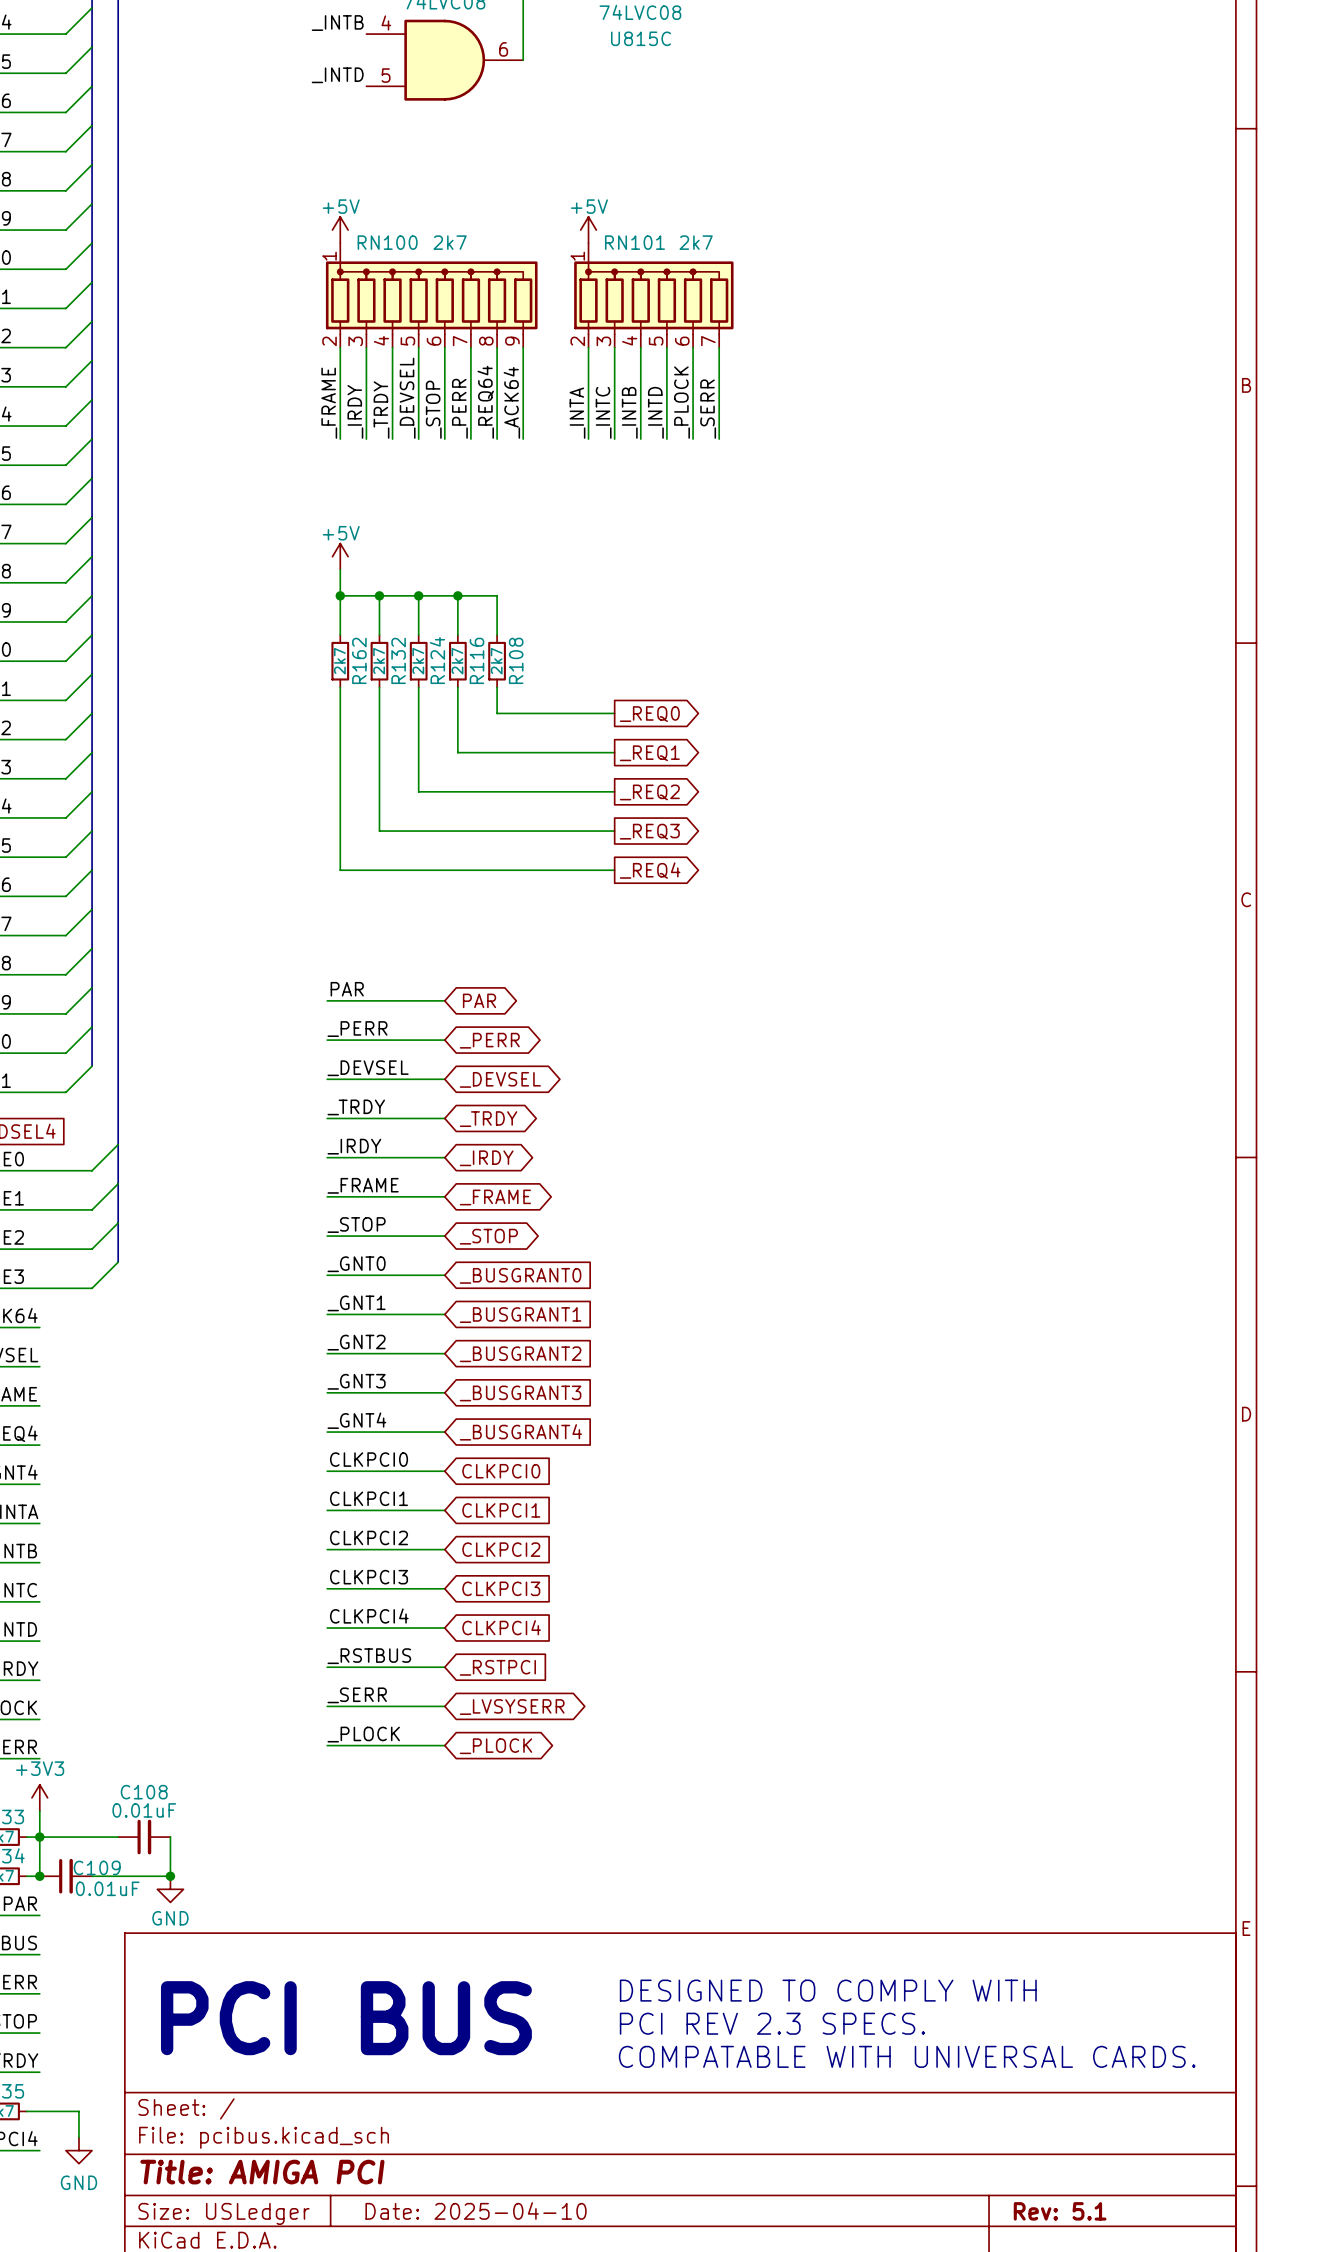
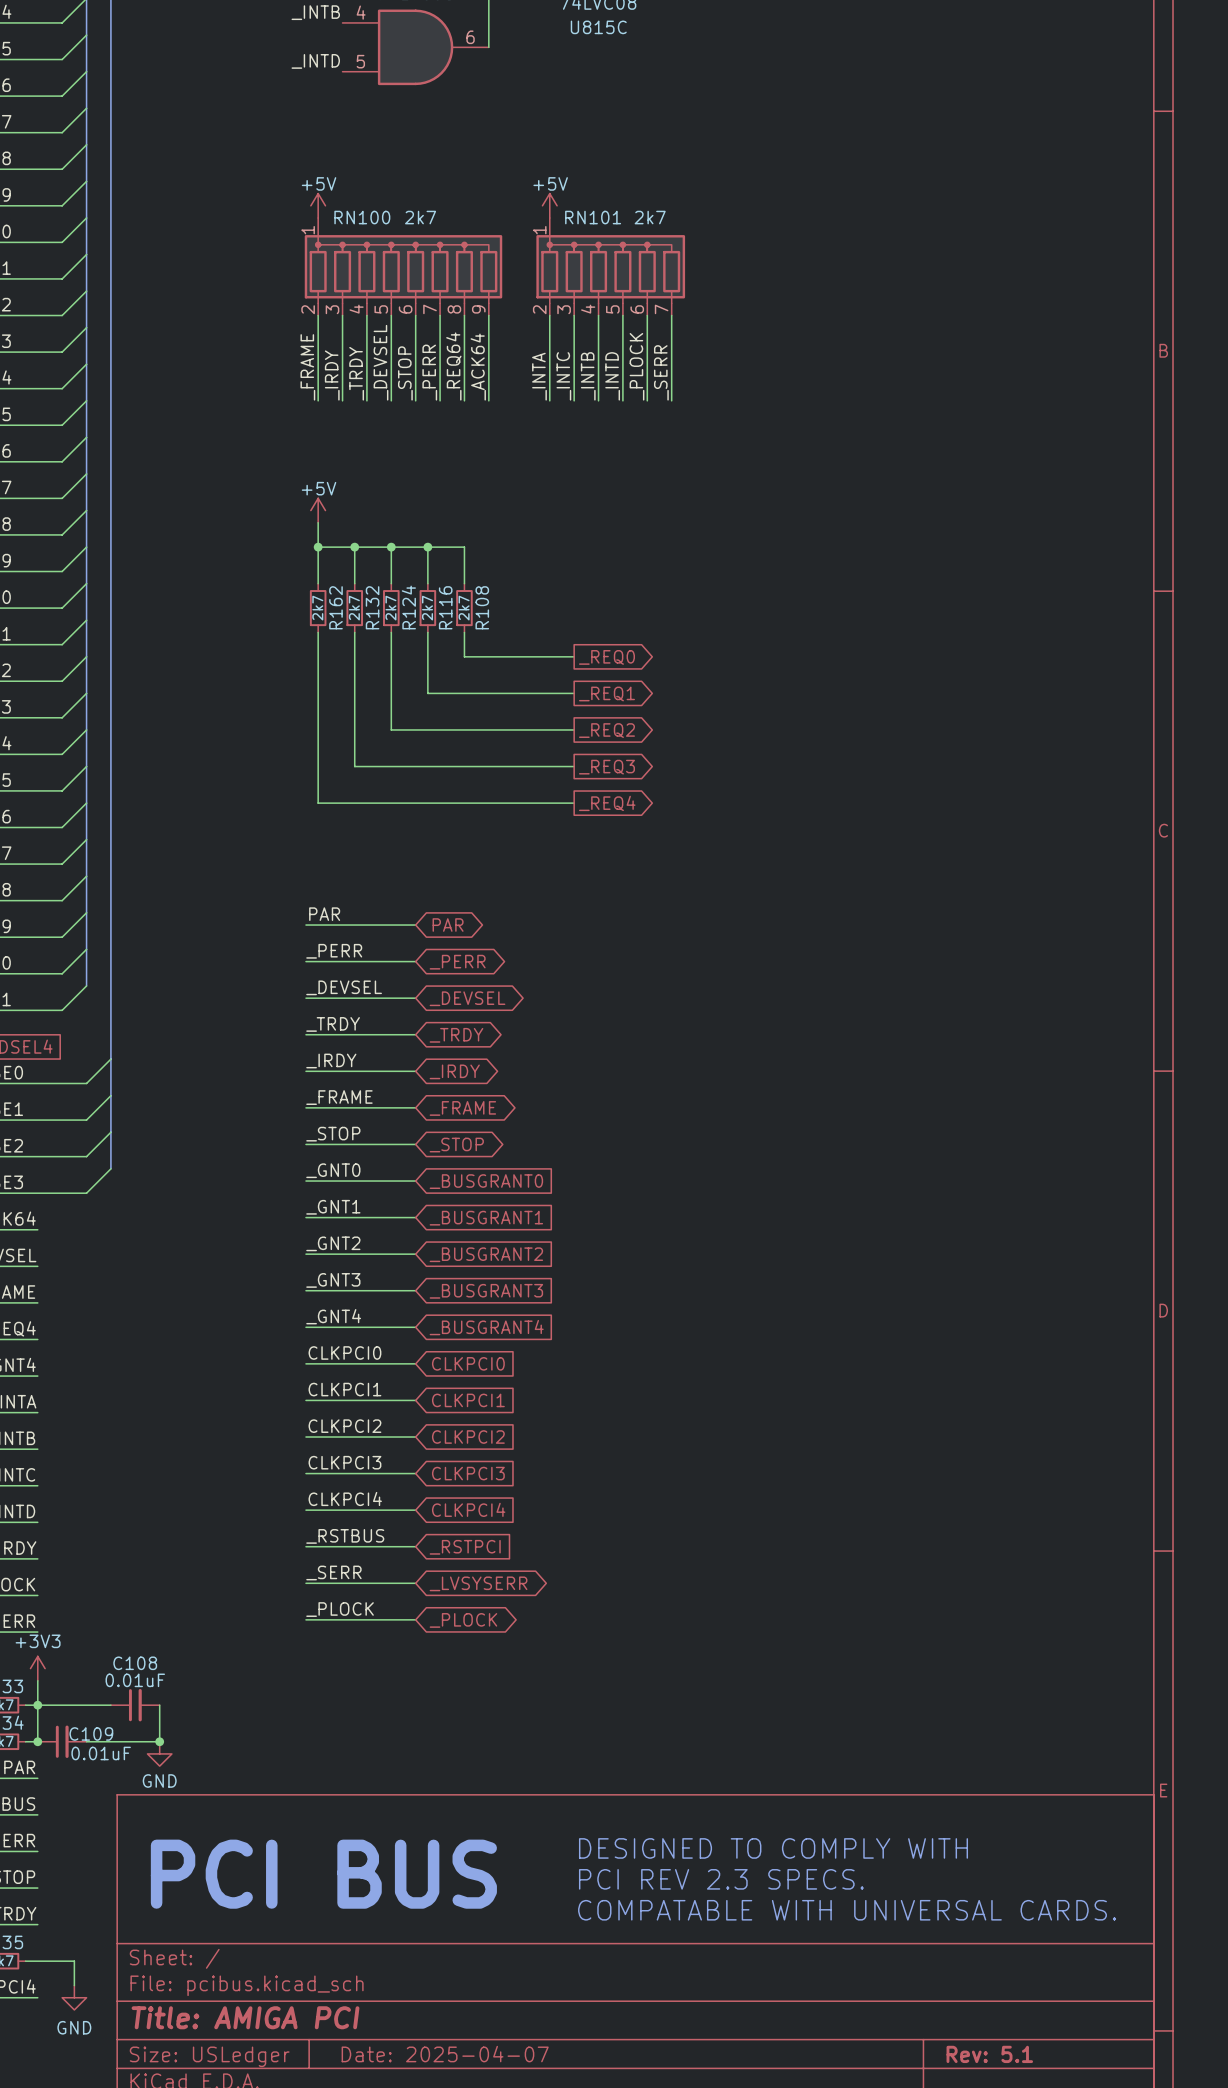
title block: Date: 2025-04-10 (476, 2210) -> Date: 2025-04-07 (445, 2054)

